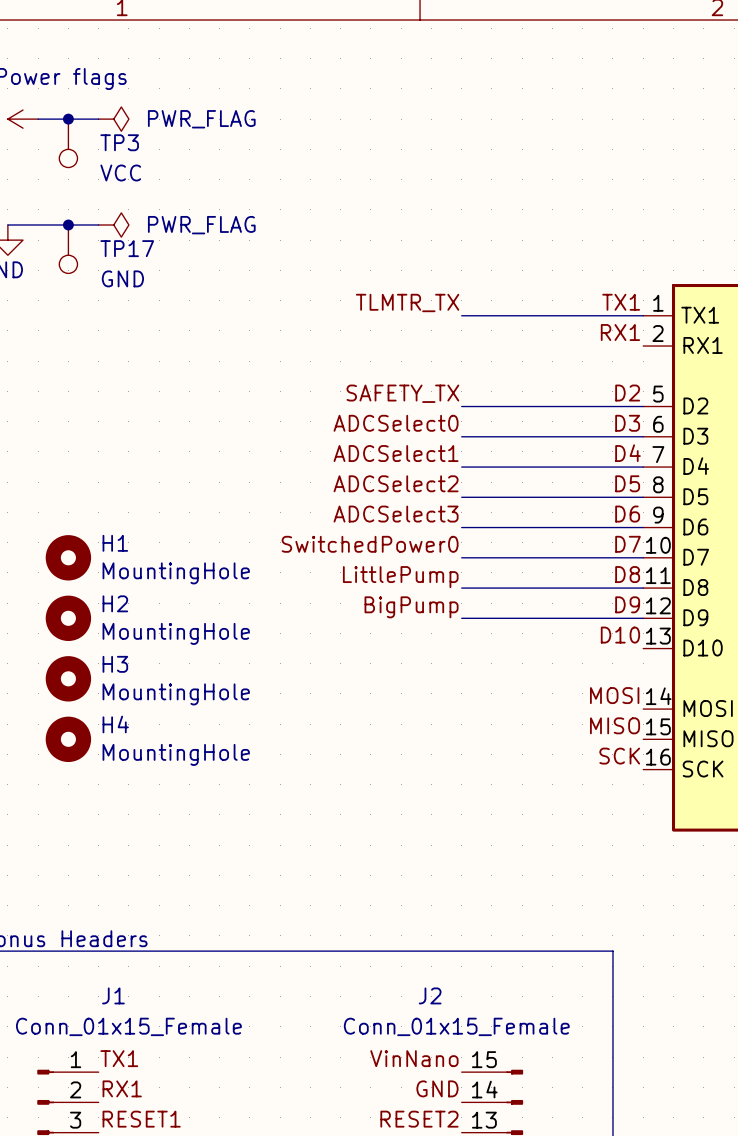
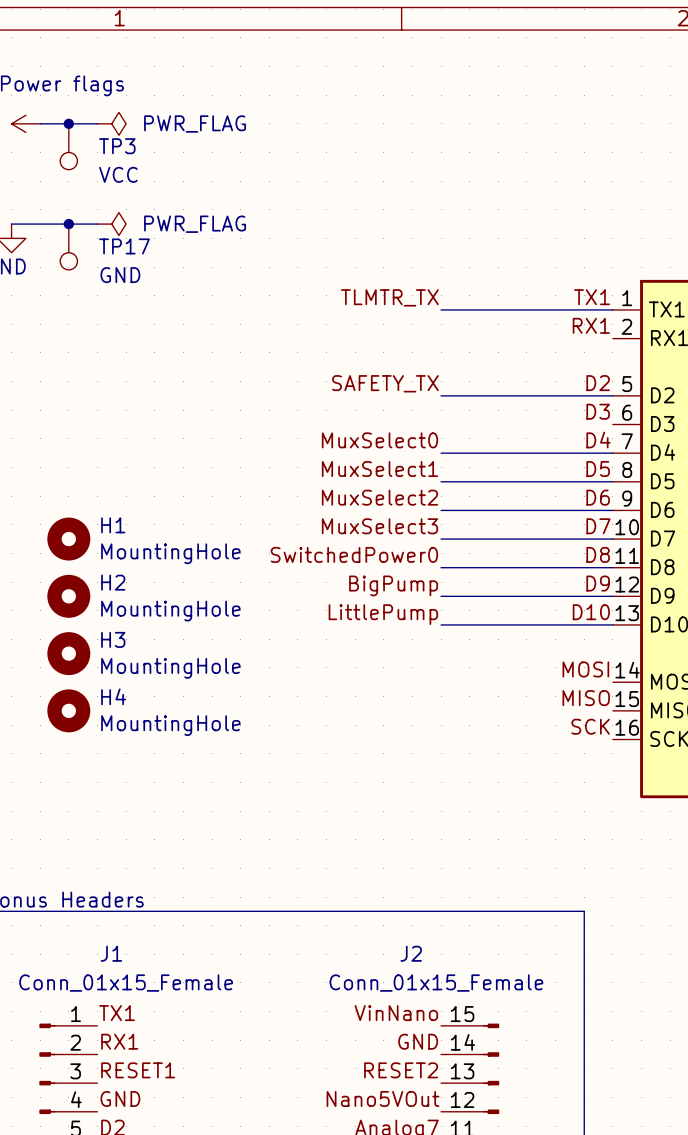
label: ADCSelect0 (396, 423) -> none
wire: (461, 436) (643, 436) -> (441, 624) (612, 624)
label: ADCSelect1 (396, 453) -> MuxSelect0 (379, 440)
label: ADCSelect2 (396, 483) -> MuxSelect1 (379, 469)
label: ADCSelect3 (396, 514) -> MuxSelect2 (379, 497)
label: SwitchedPower0 (370, 544) -> MuxSelect3 (379, 526)
label: LittlePump (400, 577) -> SwitchedPower0 (354, 554)
label: none -> LittlePump (383, 614)

